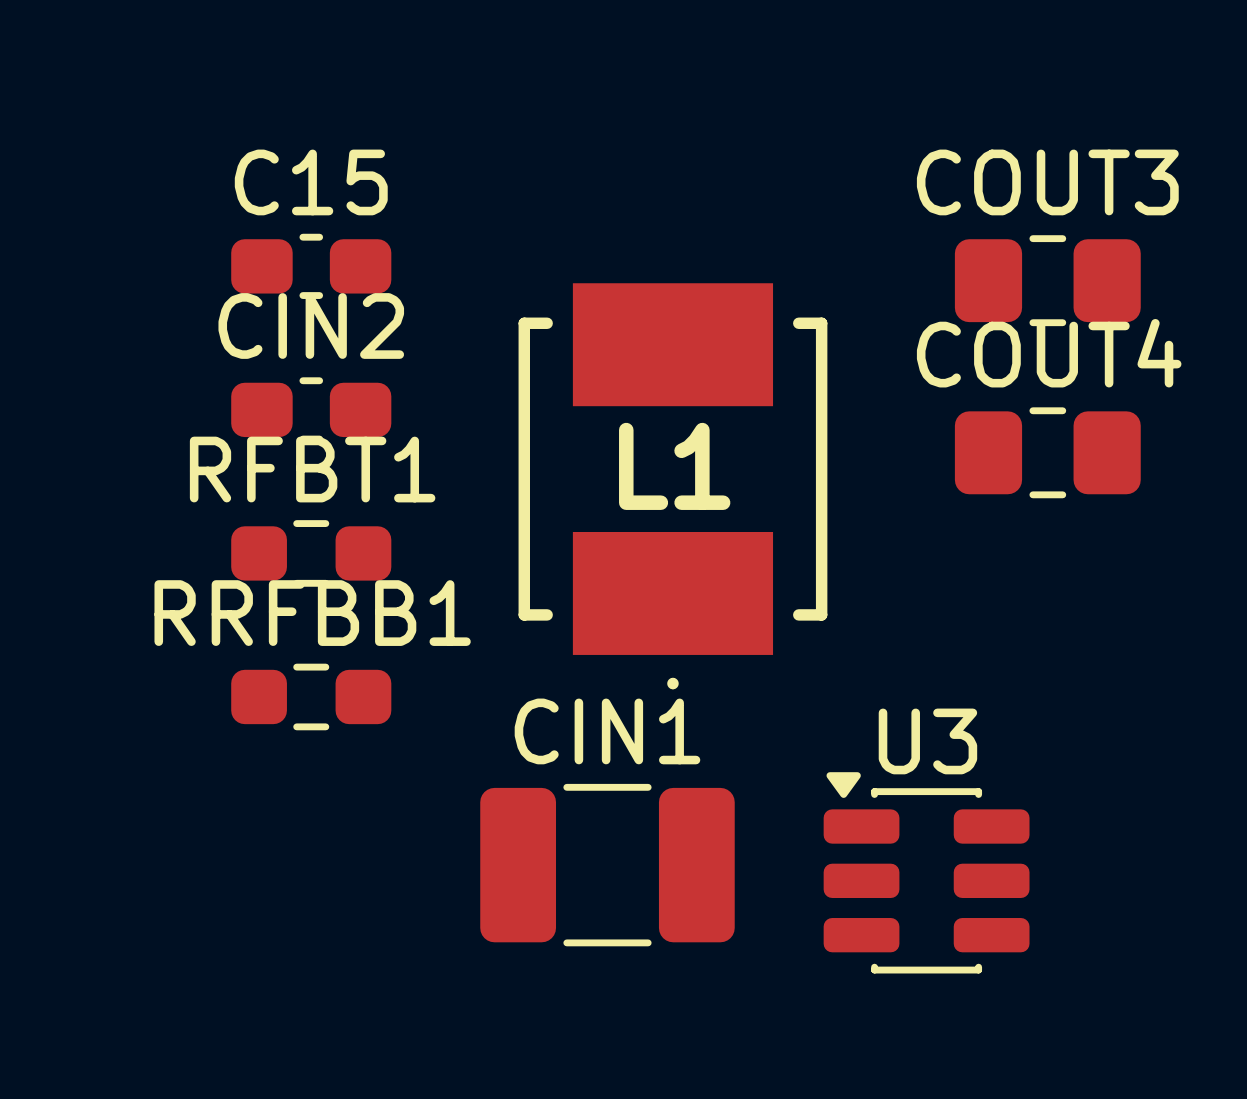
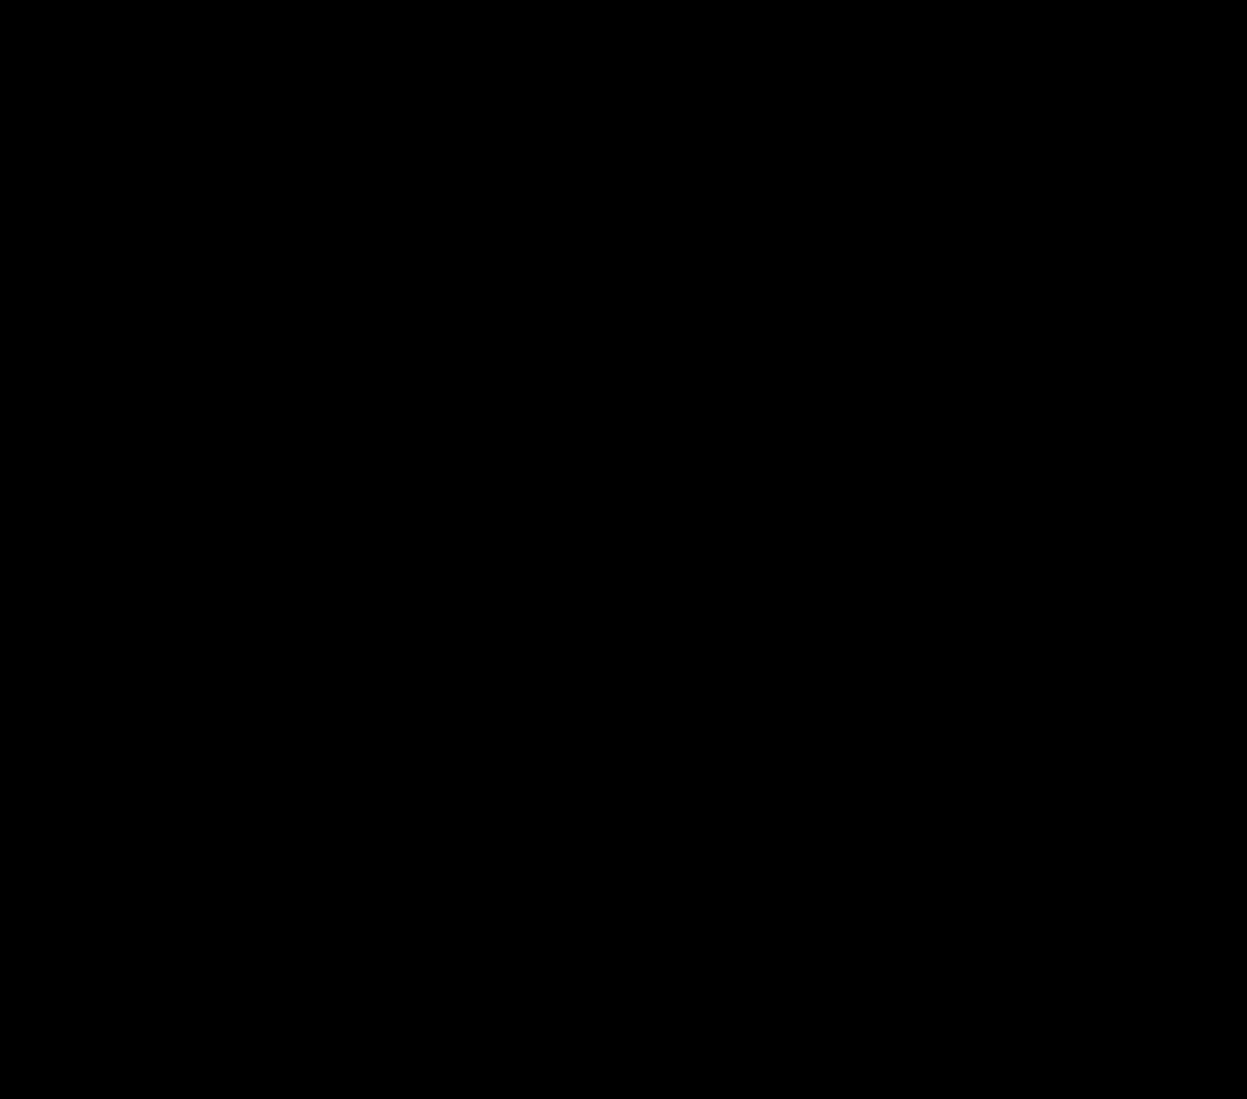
C15: (311, 266) -> none
COUT3: (1047, 280) -> none
CIN2: (311, 409) -> none
COUT4: (1047, 452) -> none
L1: (672, 486) -> none
RFBT1: (311, 553) -> none
RRFBB1: (311, 696) -> none
CIN1: (607, 865) -> none
U3: (926, 872) -> none

